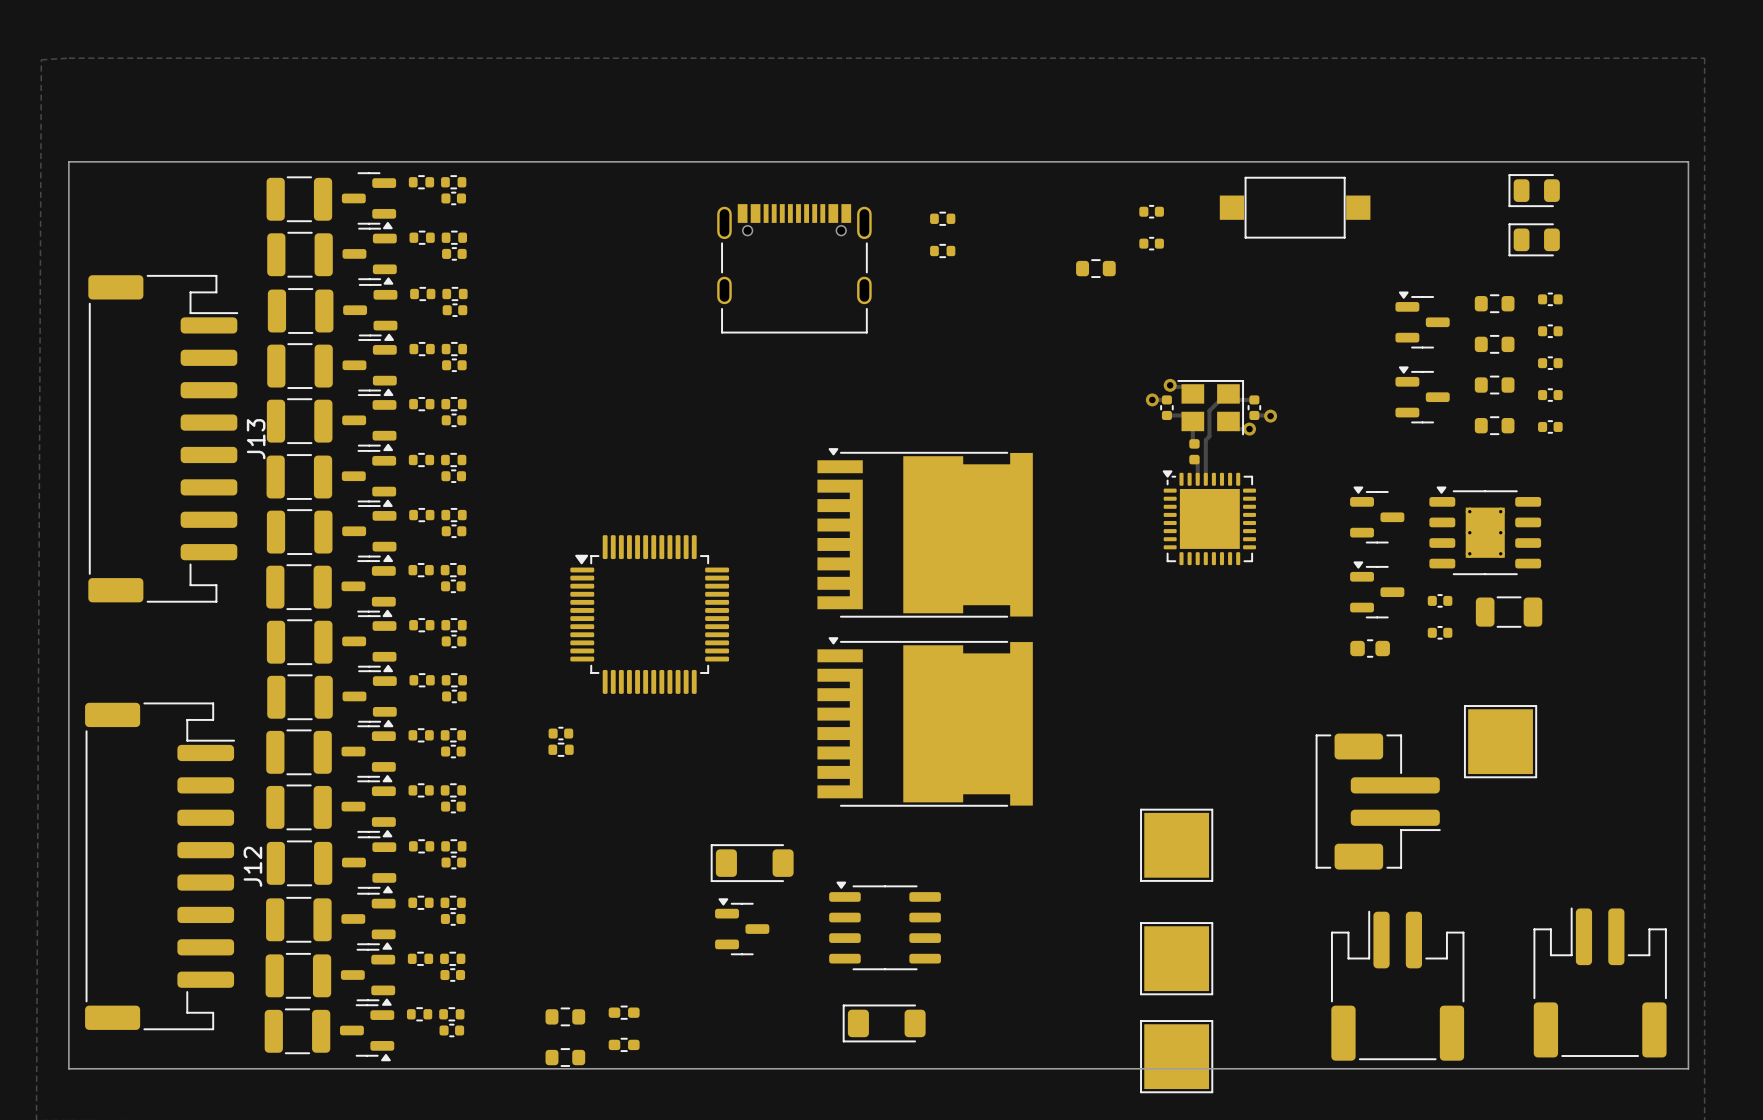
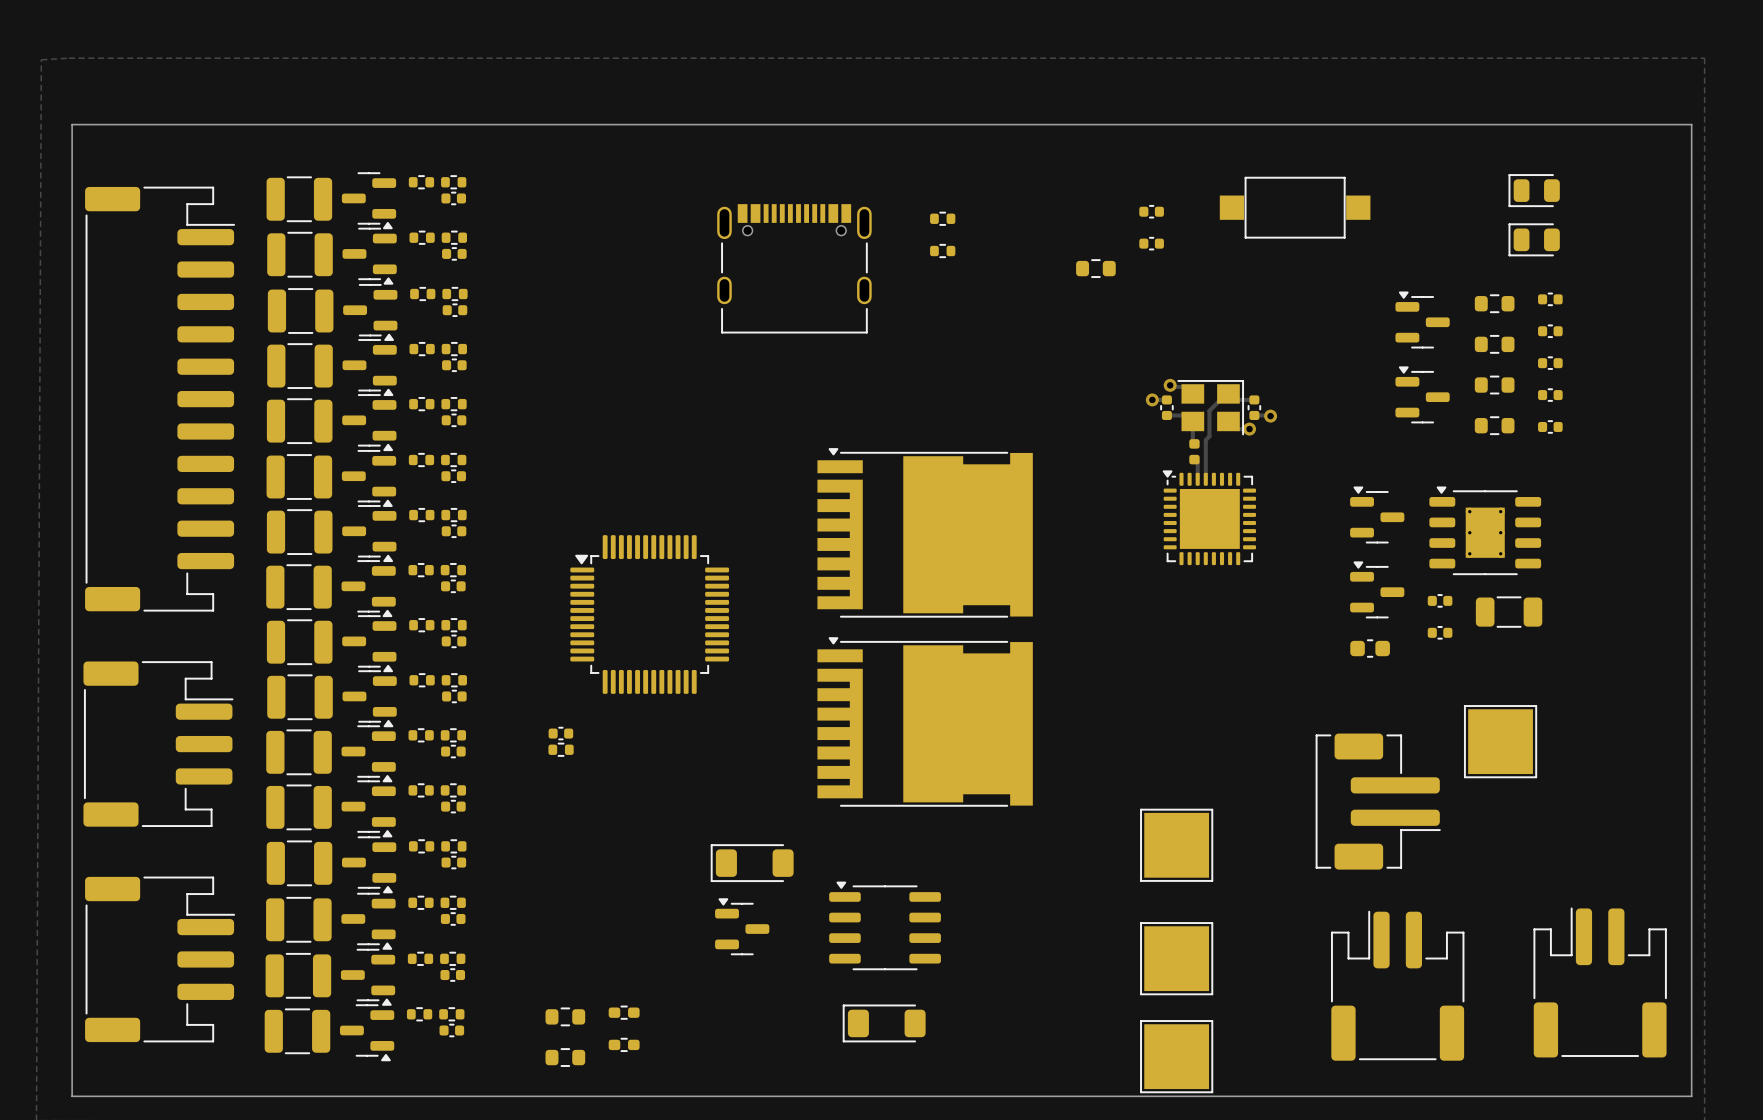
board edge: (68, 161) (1688, 161) (1688, 1068) (68, 1068) (68, 161) -> (72, 124) (72, 1096) (1691, 1096) (1691, 124) (72, 124)
part: none -> (160, 399)
J13: (163, 438) -> none
part: none -> (158, 744)
J12: (160, 866) -> none
part: none -> (160, 959)

